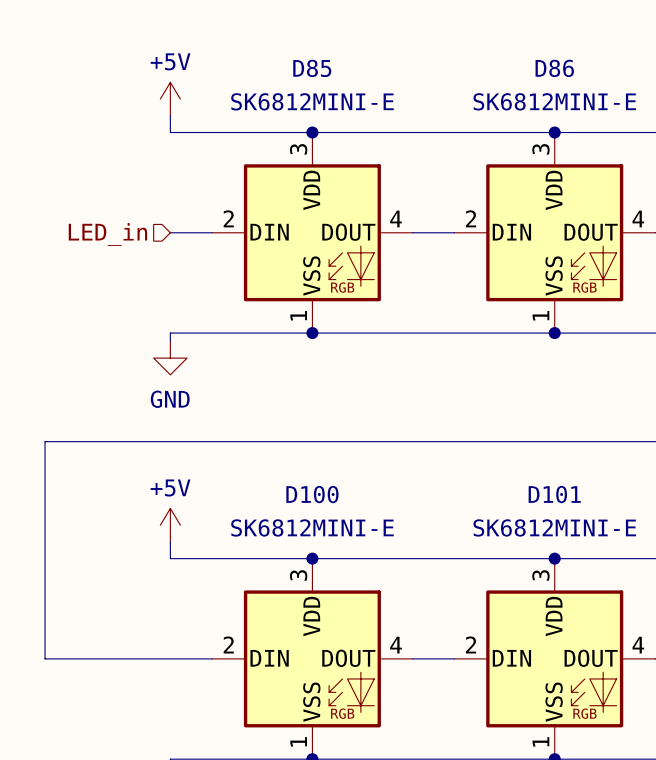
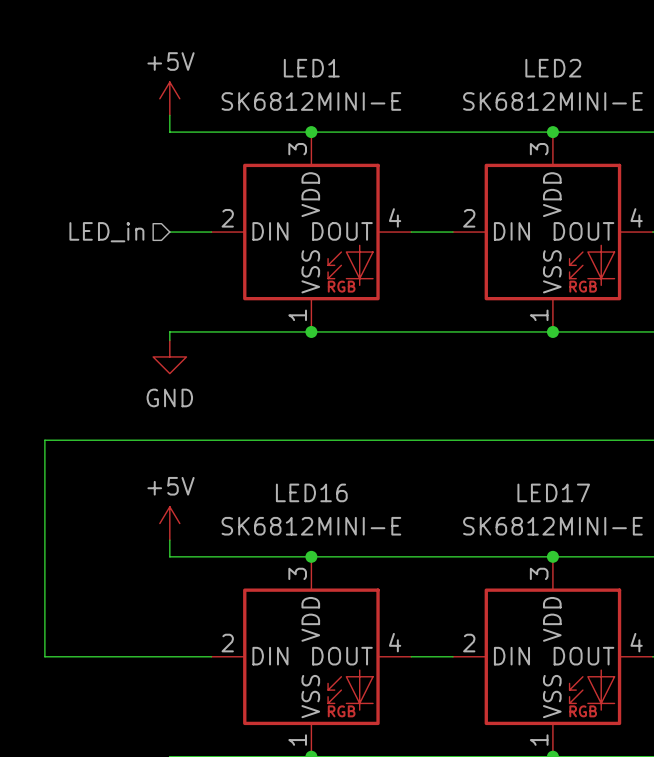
D85 name: D85 (312, 68) -> LED1 (311, 68)
D86 name: D86 (554, 68) -> LED2 (553, 68)
D100 name: D100 (312, 494) -> LED16 (311, 492)
D101 name: D101 (554, 494) -> LED17 (553, 492)

